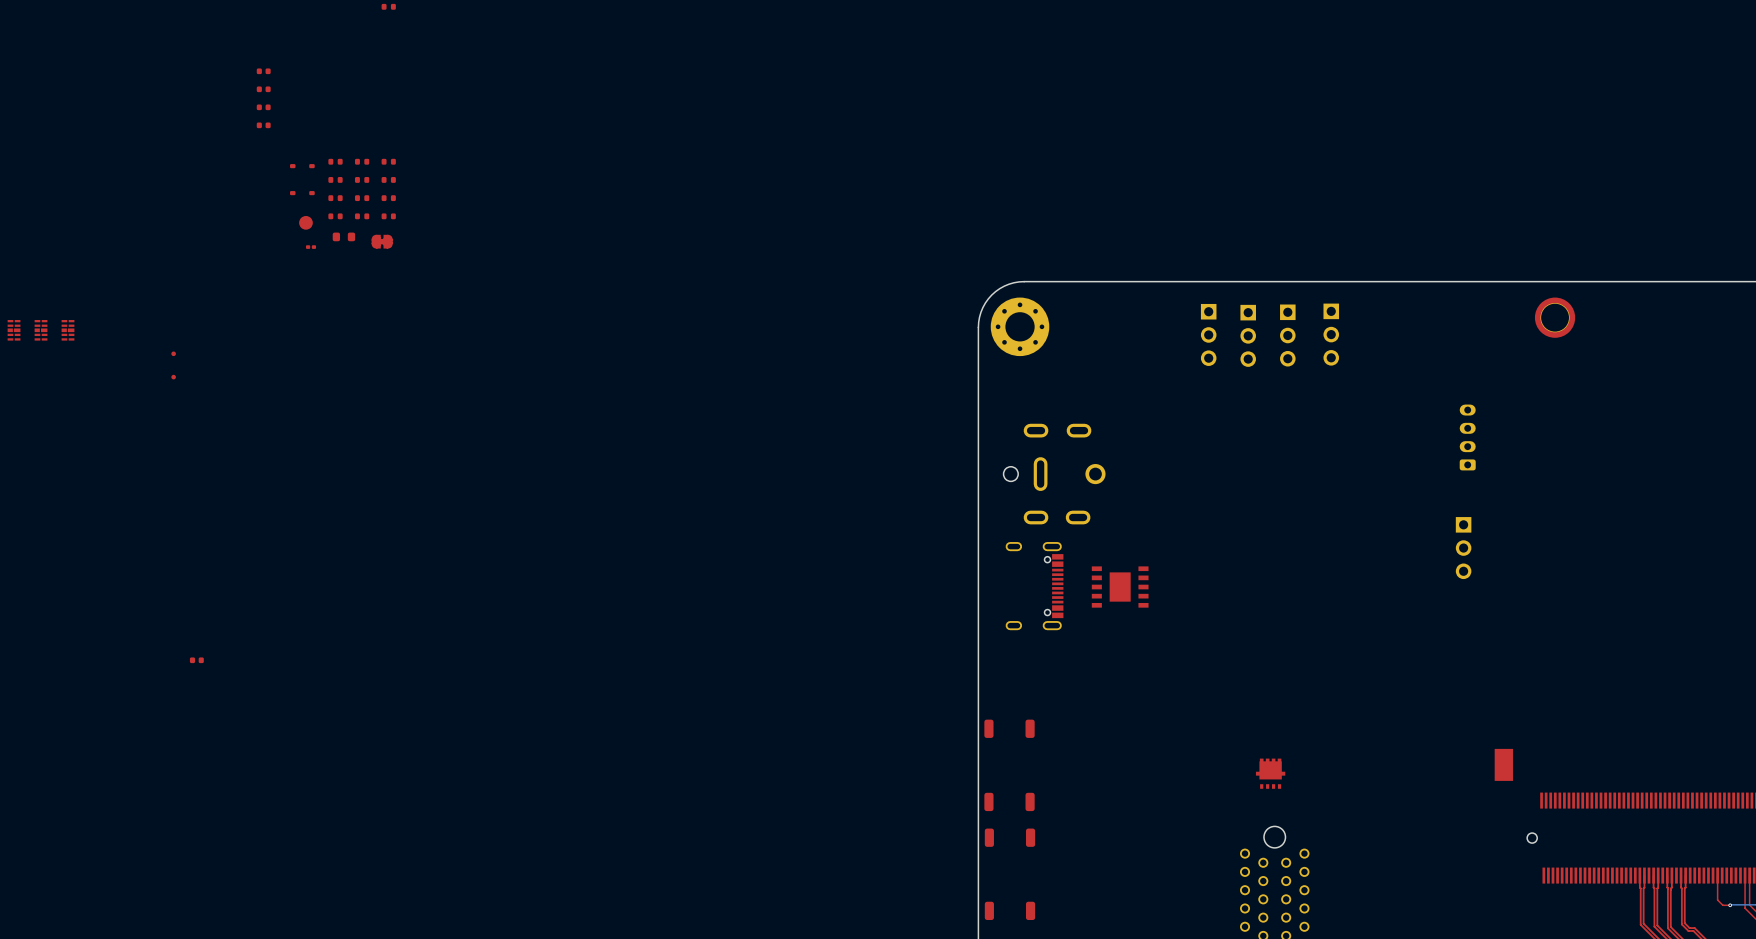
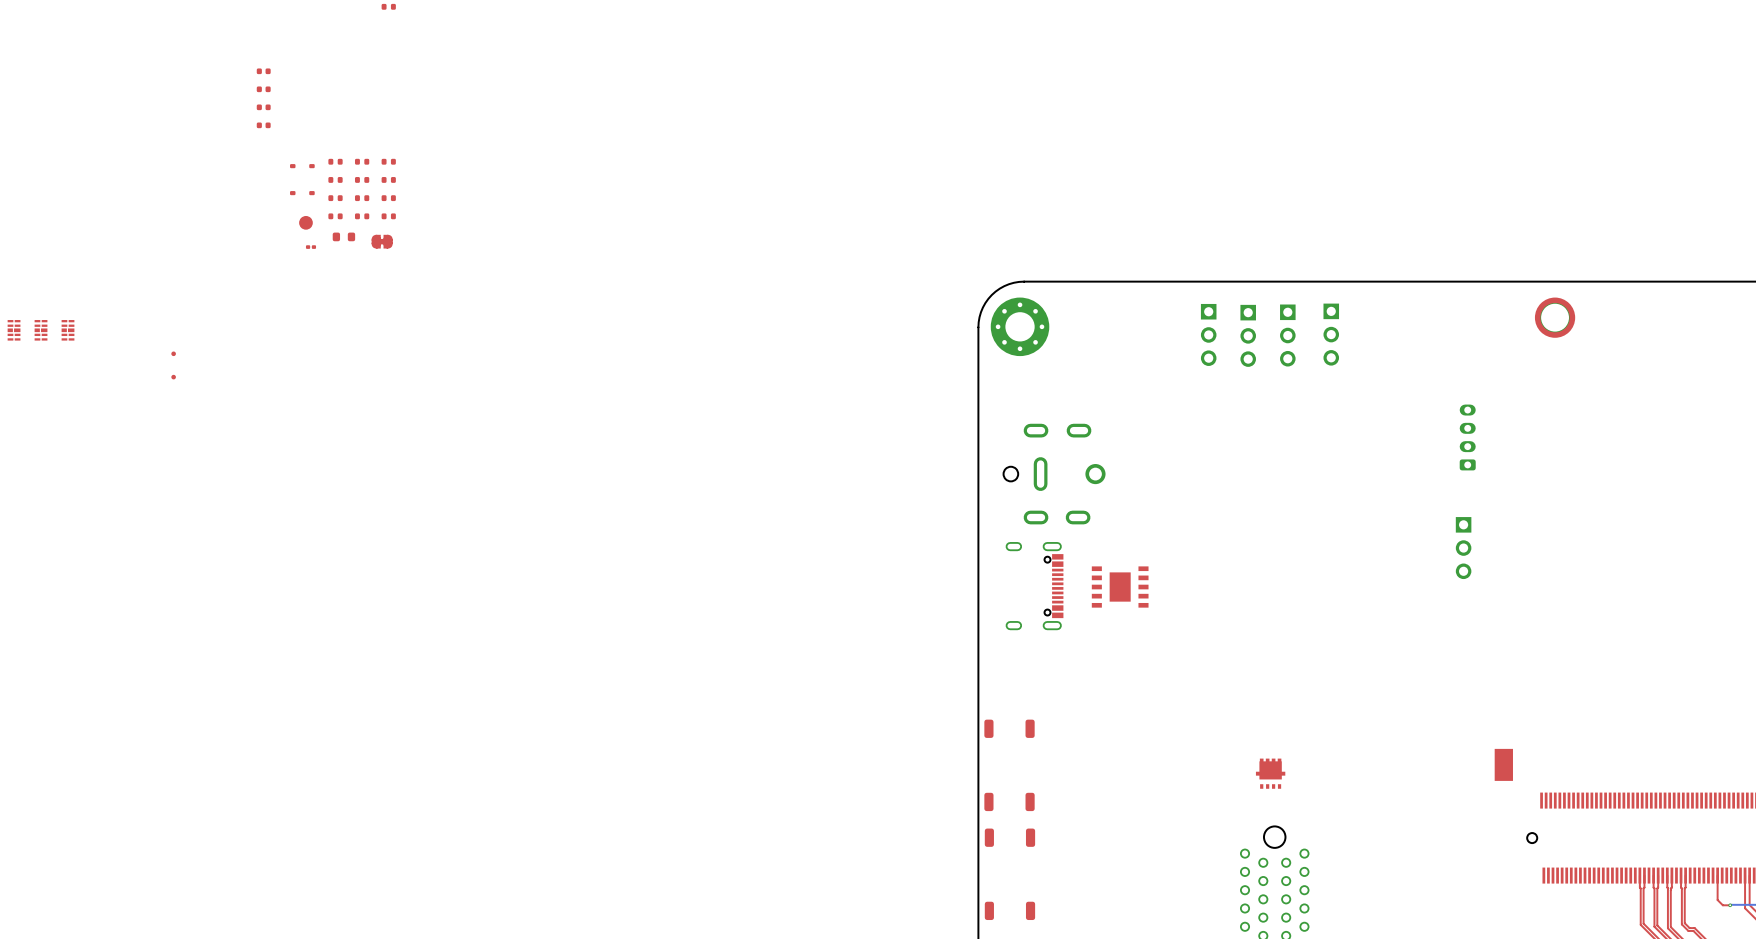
part: (196, 660) -> none

